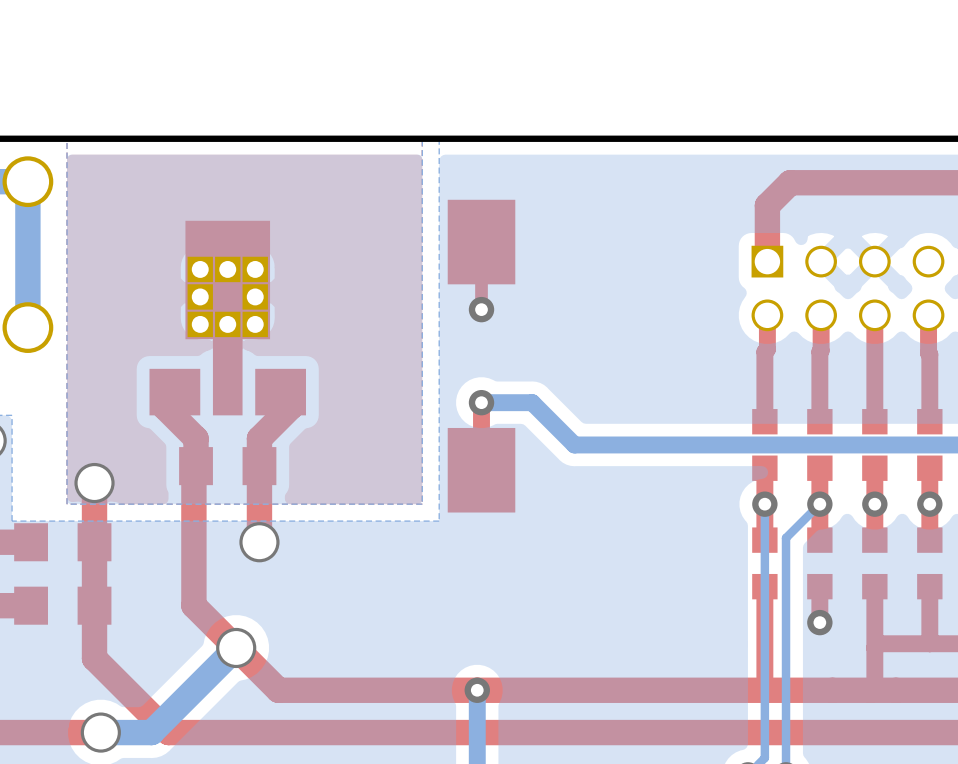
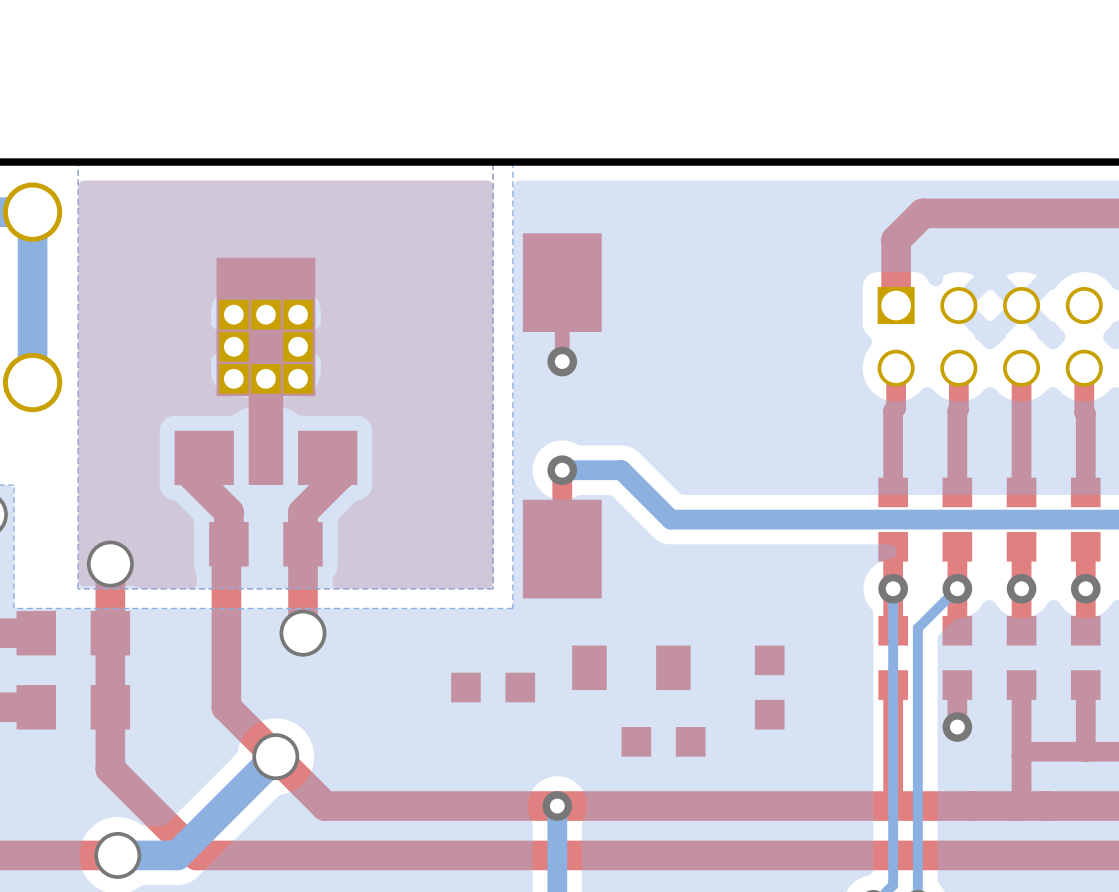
part: none -> (631, 667)
part: none -> (493, 687)
part: none -> (769, 687)
part: none -> (663, 741)

